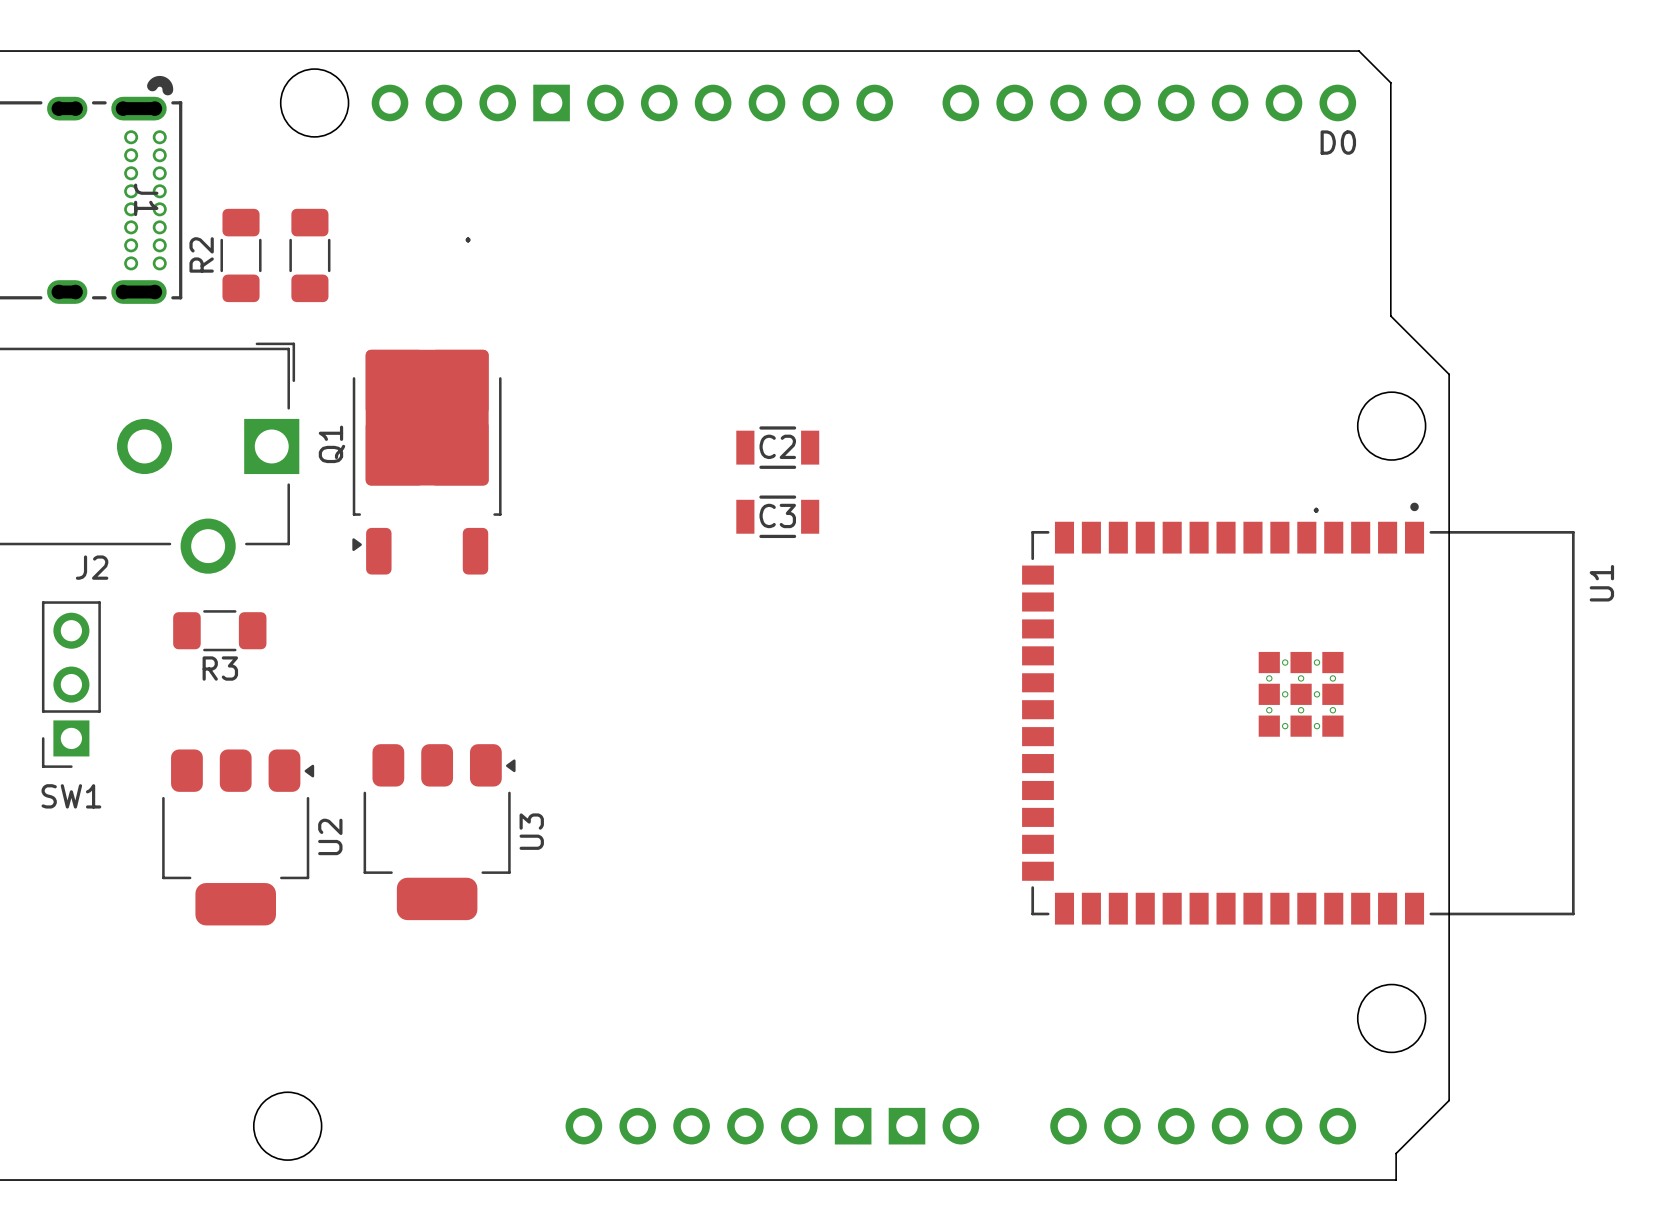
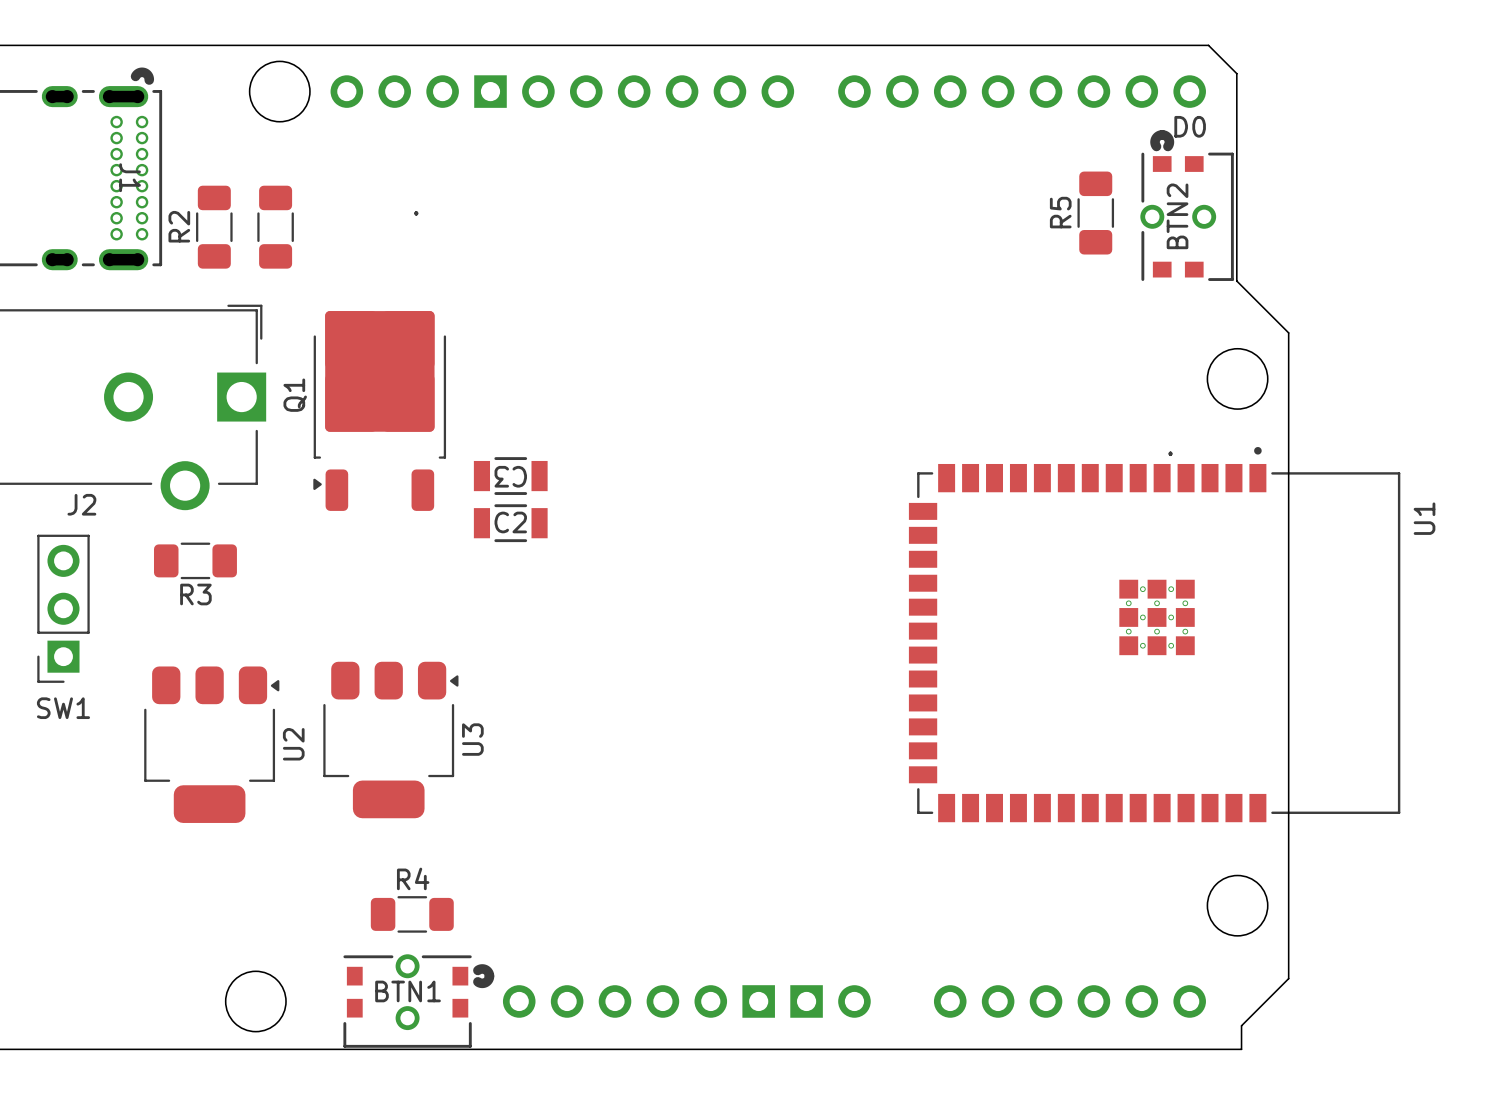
BTN2: none -> (1187, 205)
R5: none -> (1095, 213)
C2 position: (777, 447) -> (510, 523)
C3 name rotation: 0° (777, 515) -> 180° (510, 476)
C3 position: (777, 516) -> (510, 476)
R4: none -> (412, 914)
BTN1: none -> (418, 1001)

